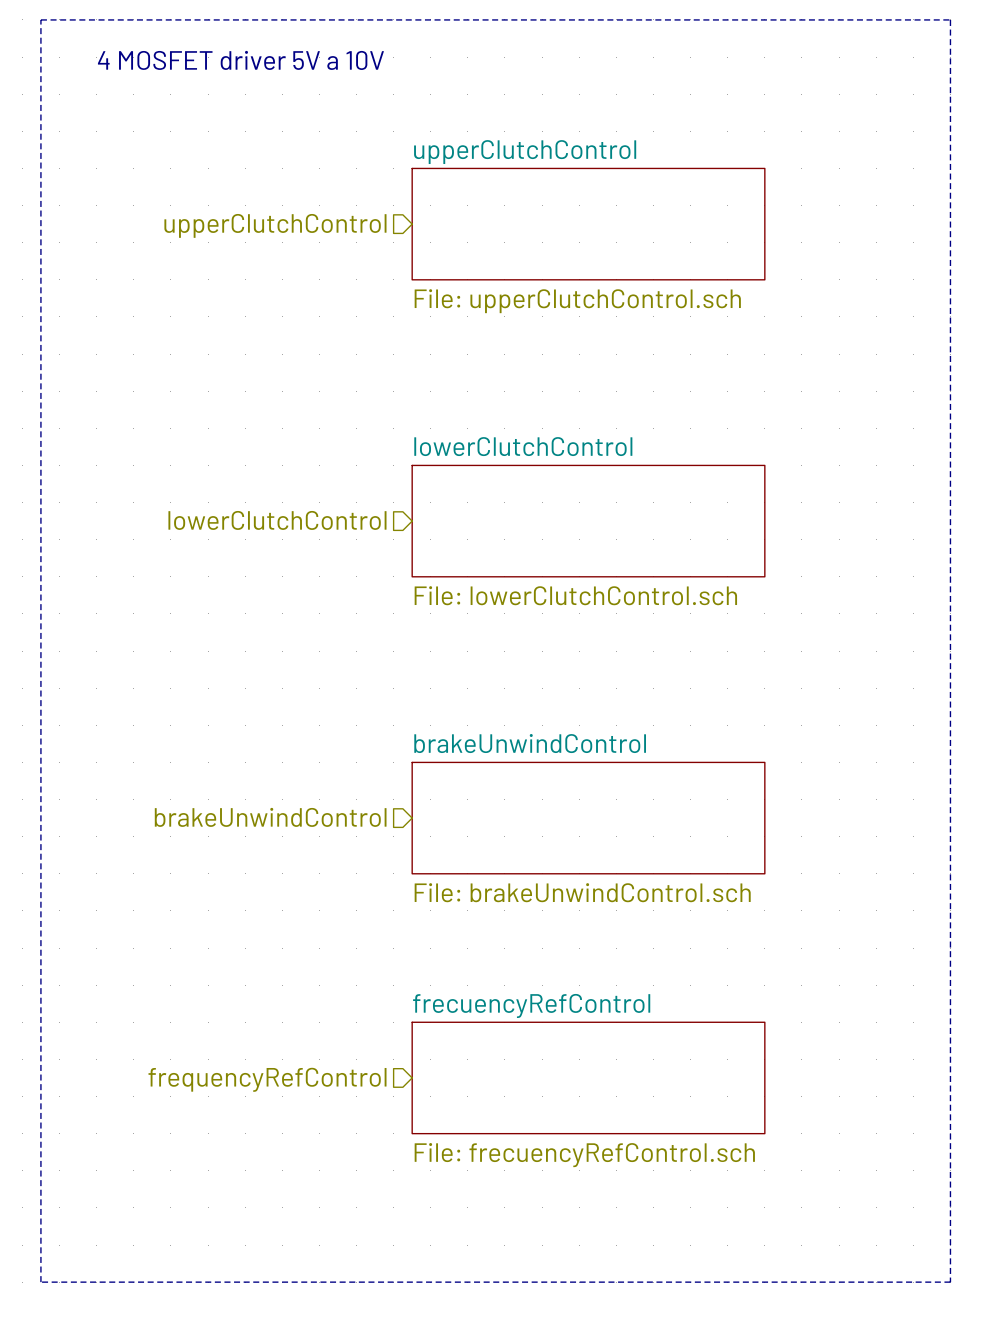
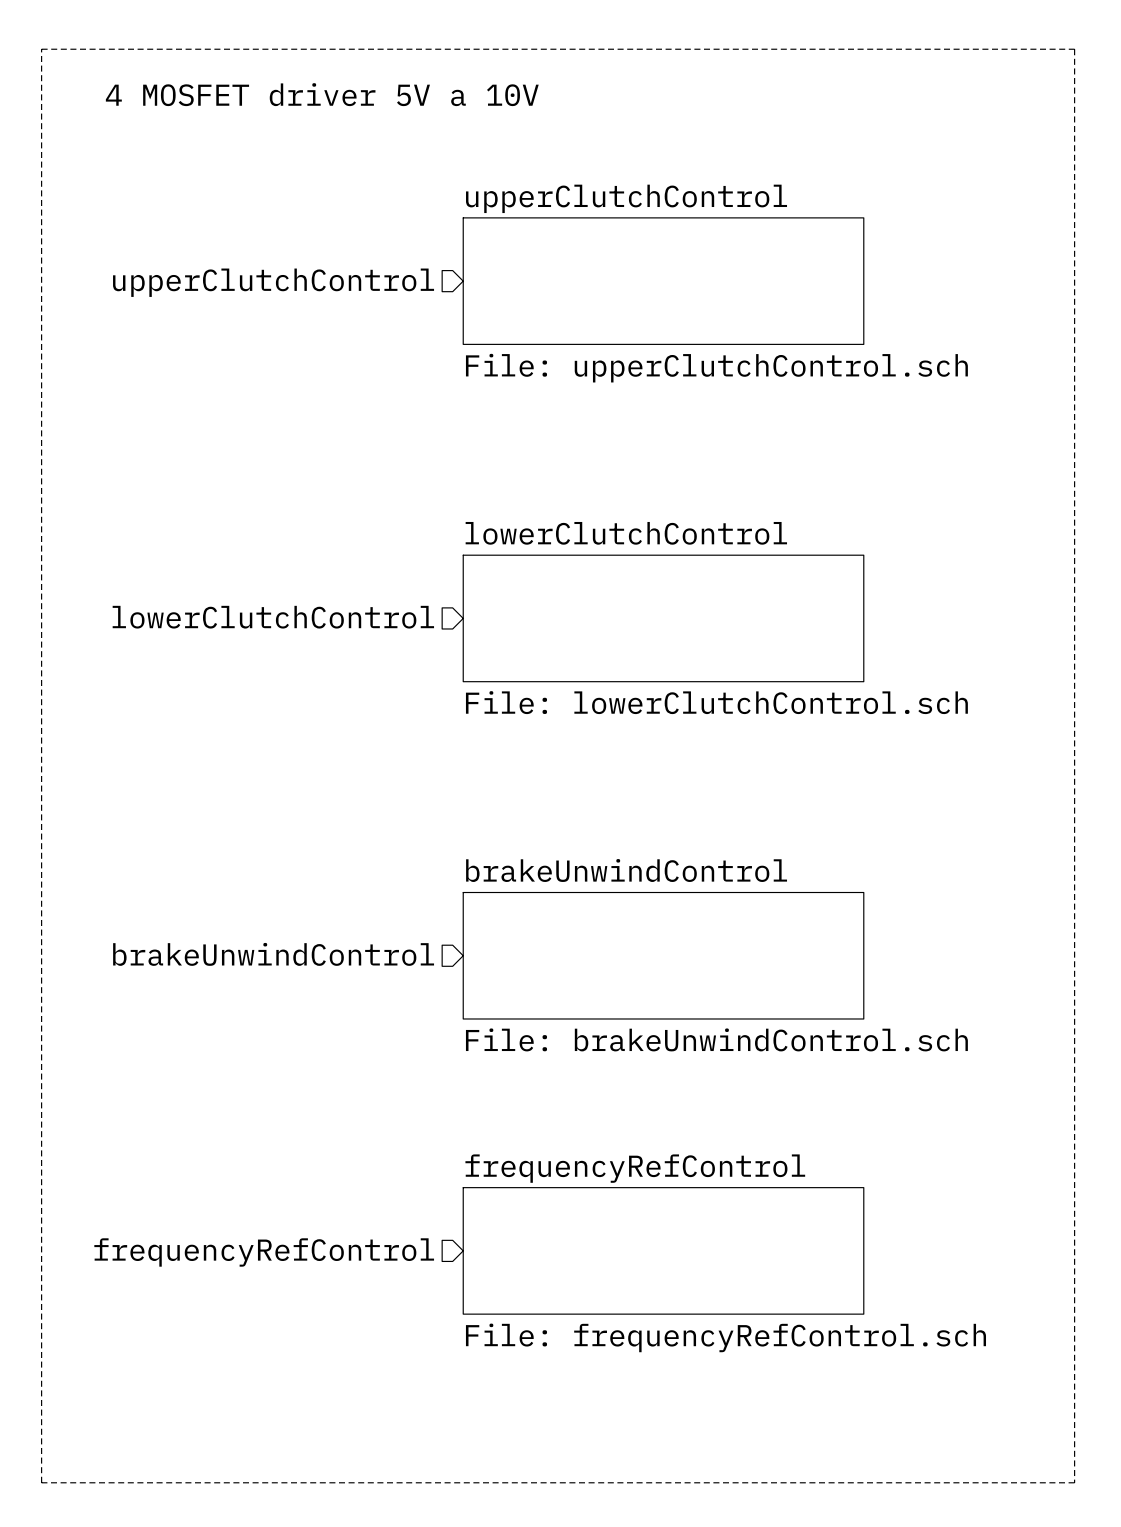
sheet frecuencyRefControl name: frecuencyRefControl (531, 1005) -> frequencyRefControl (635, 1168)
sheet frecuencyRefControl value: File: frecuencyRefControl.sch (584, 1155) -> File: frequencyRefControl.sch (725, 1337)

